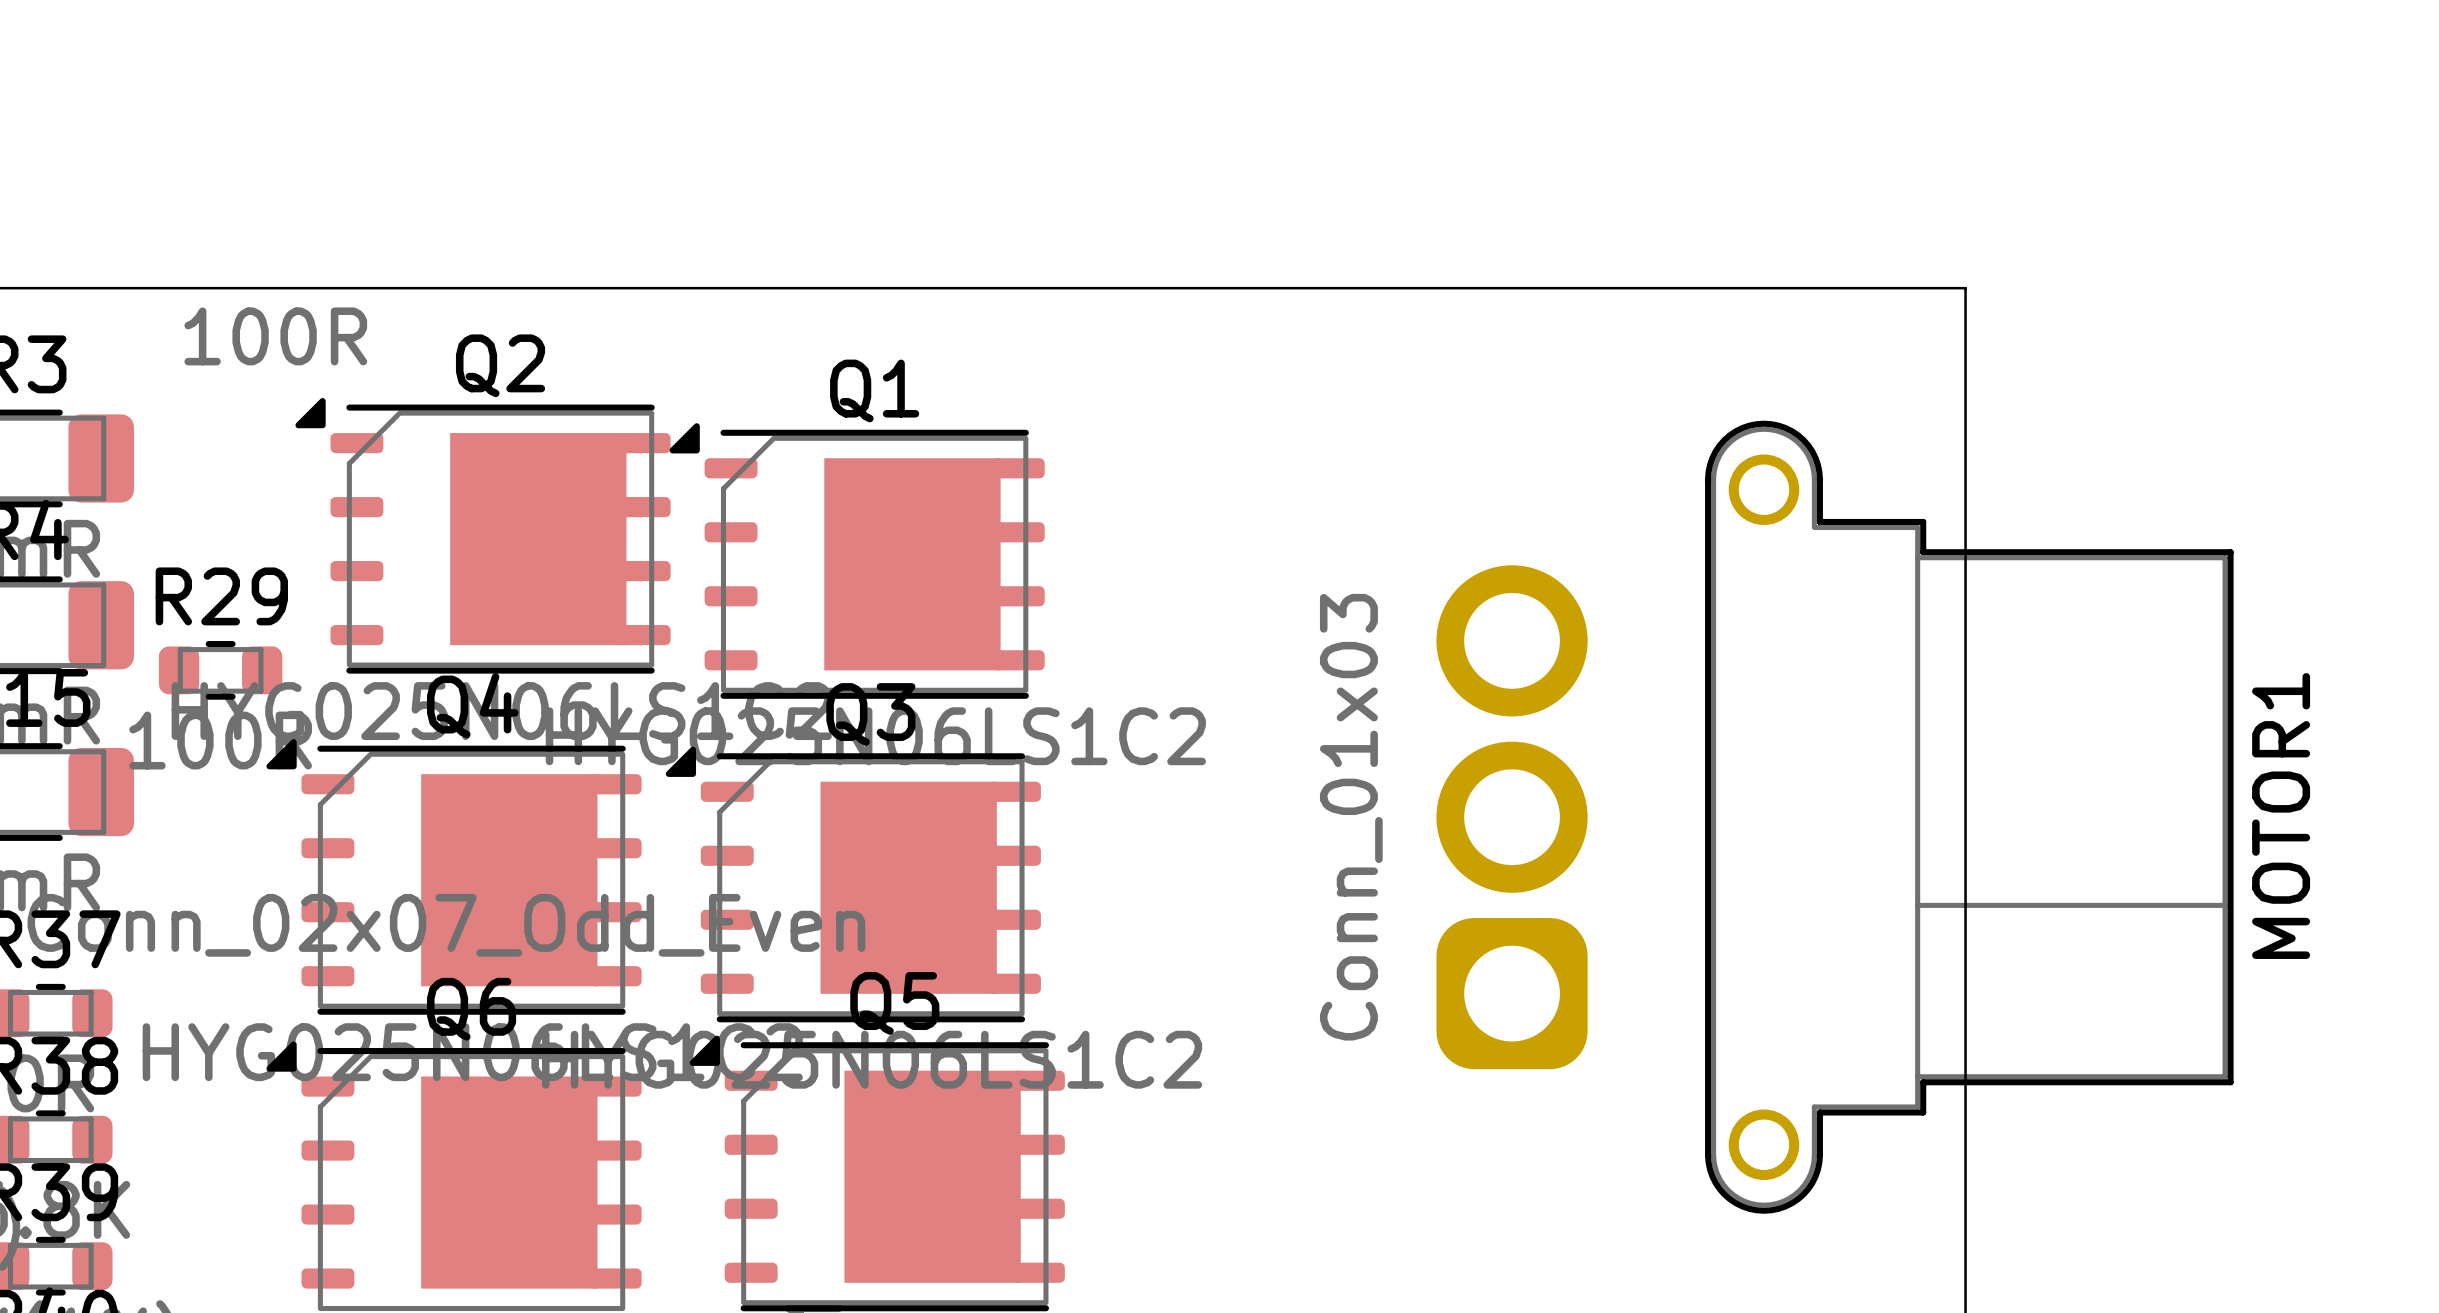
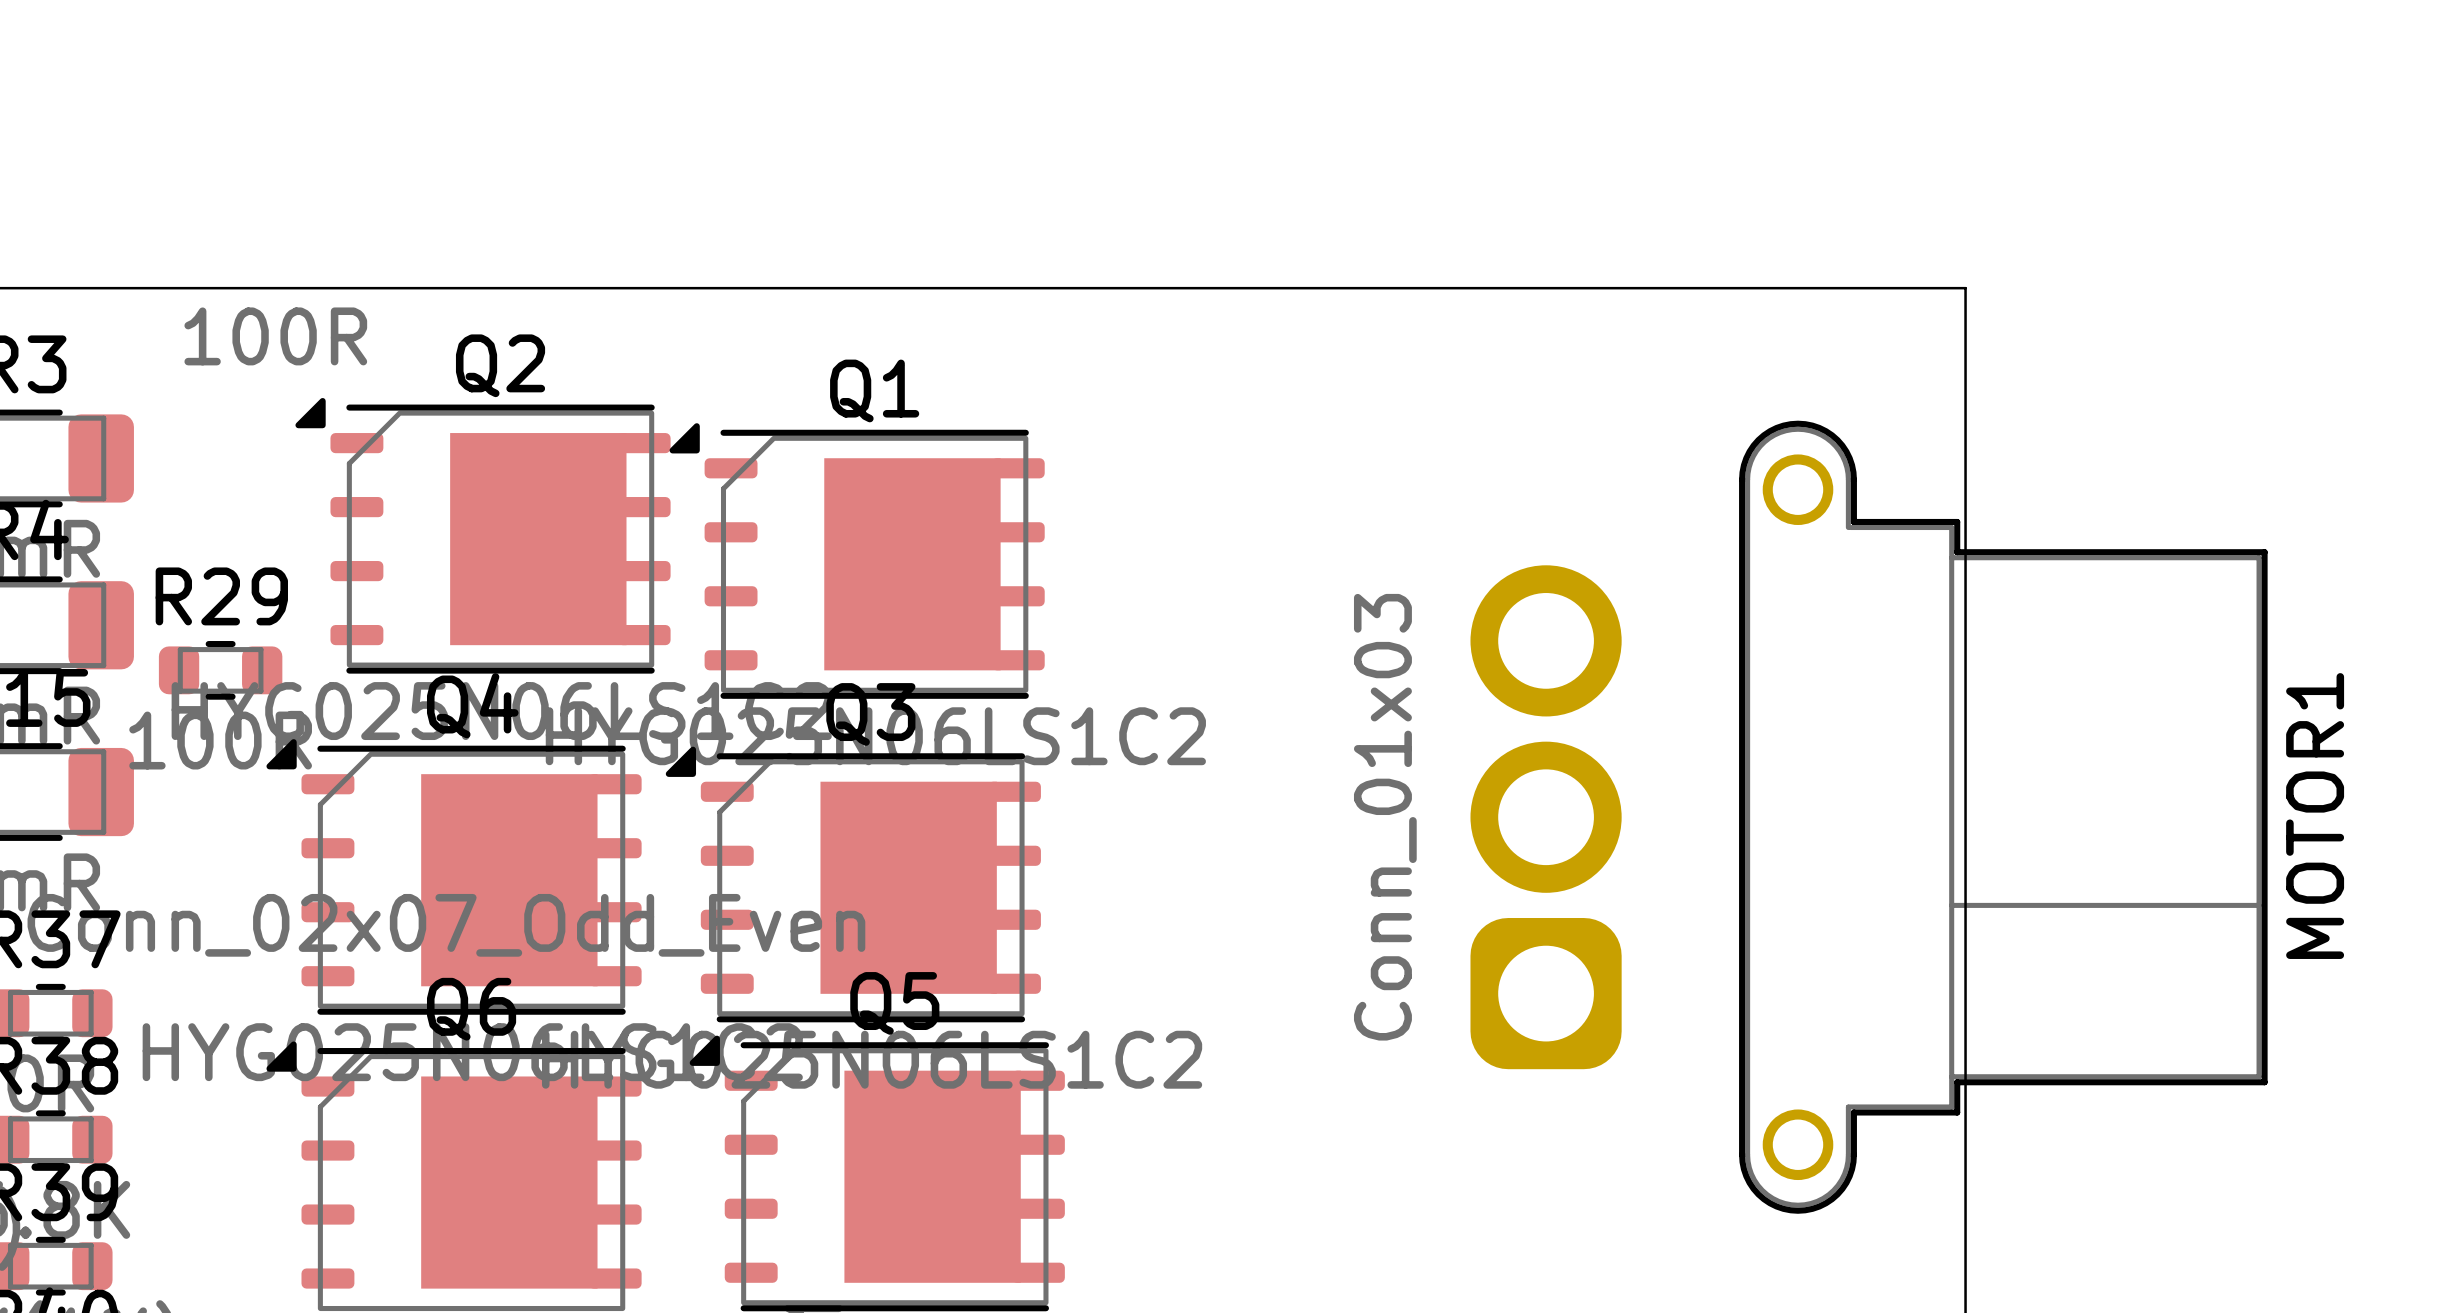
MOTOR1 position: (1835, 817) -> (1869, 817)

